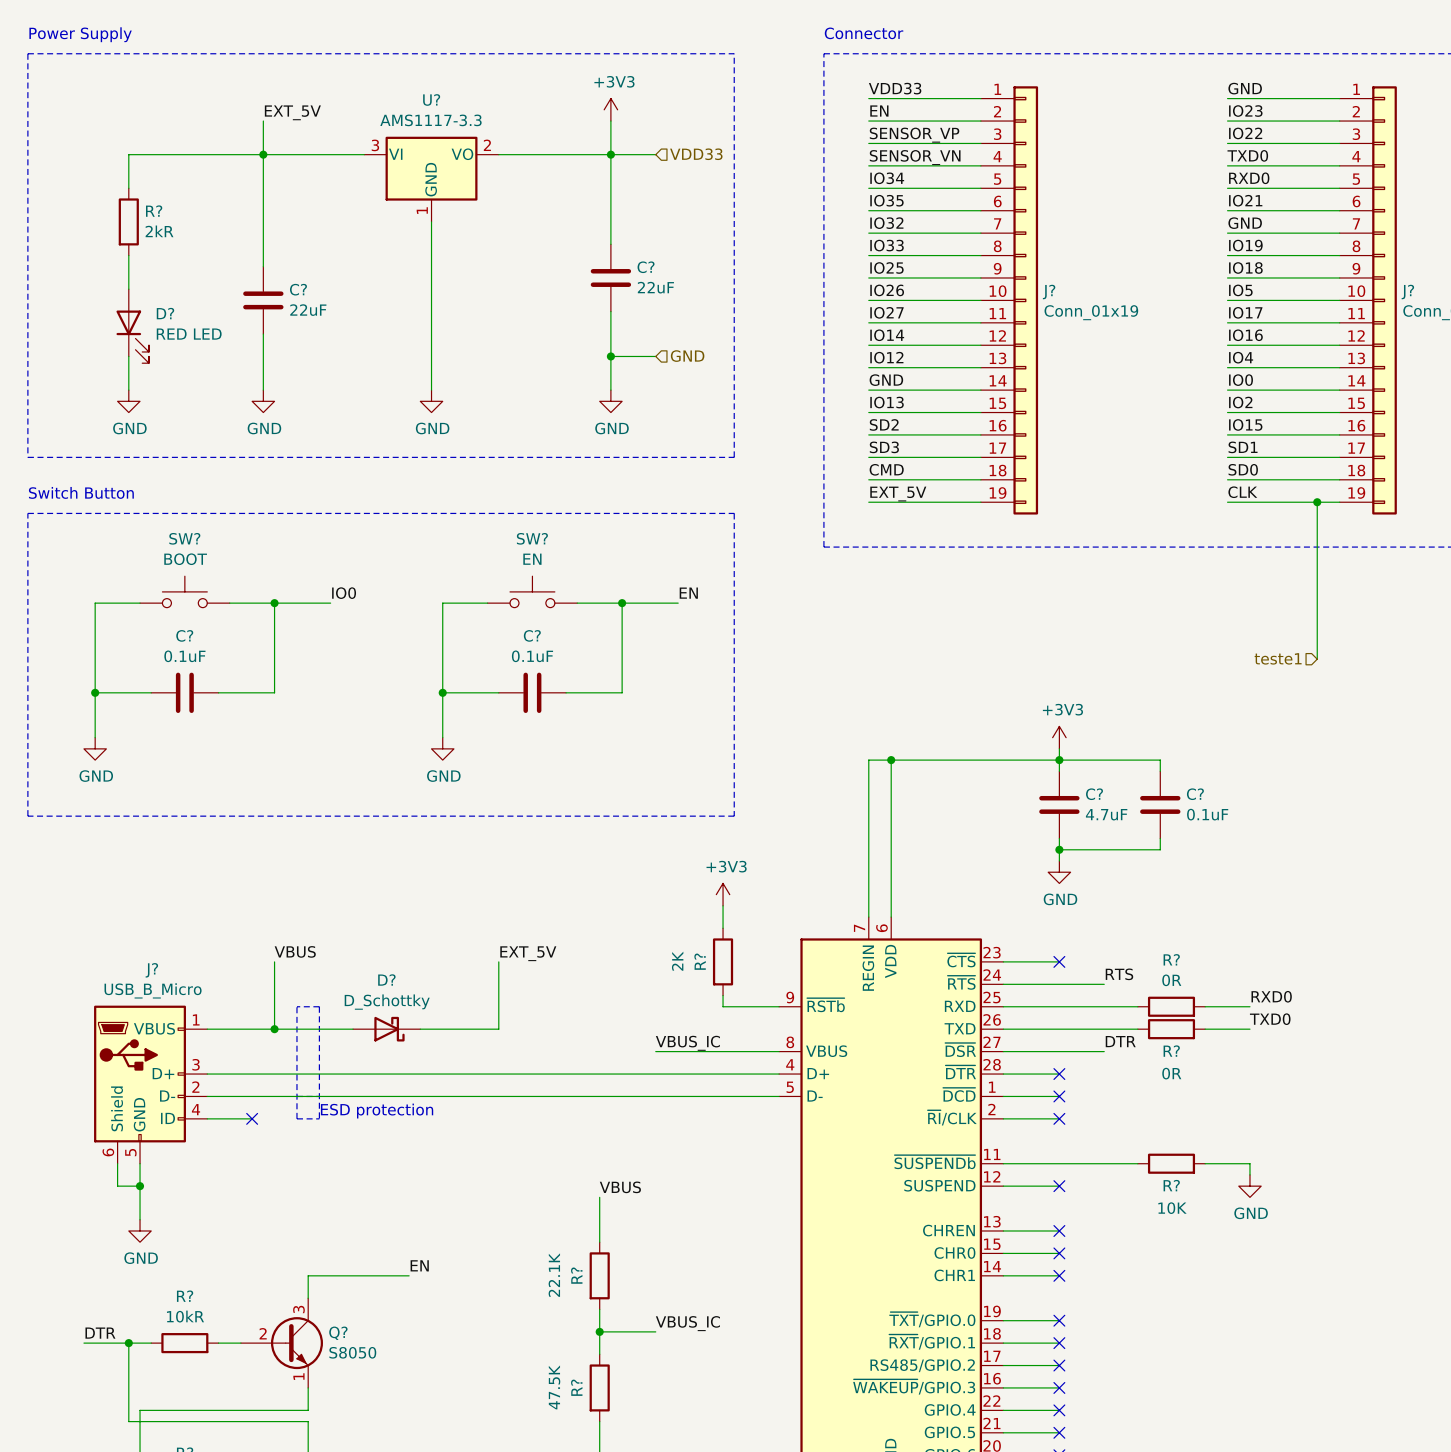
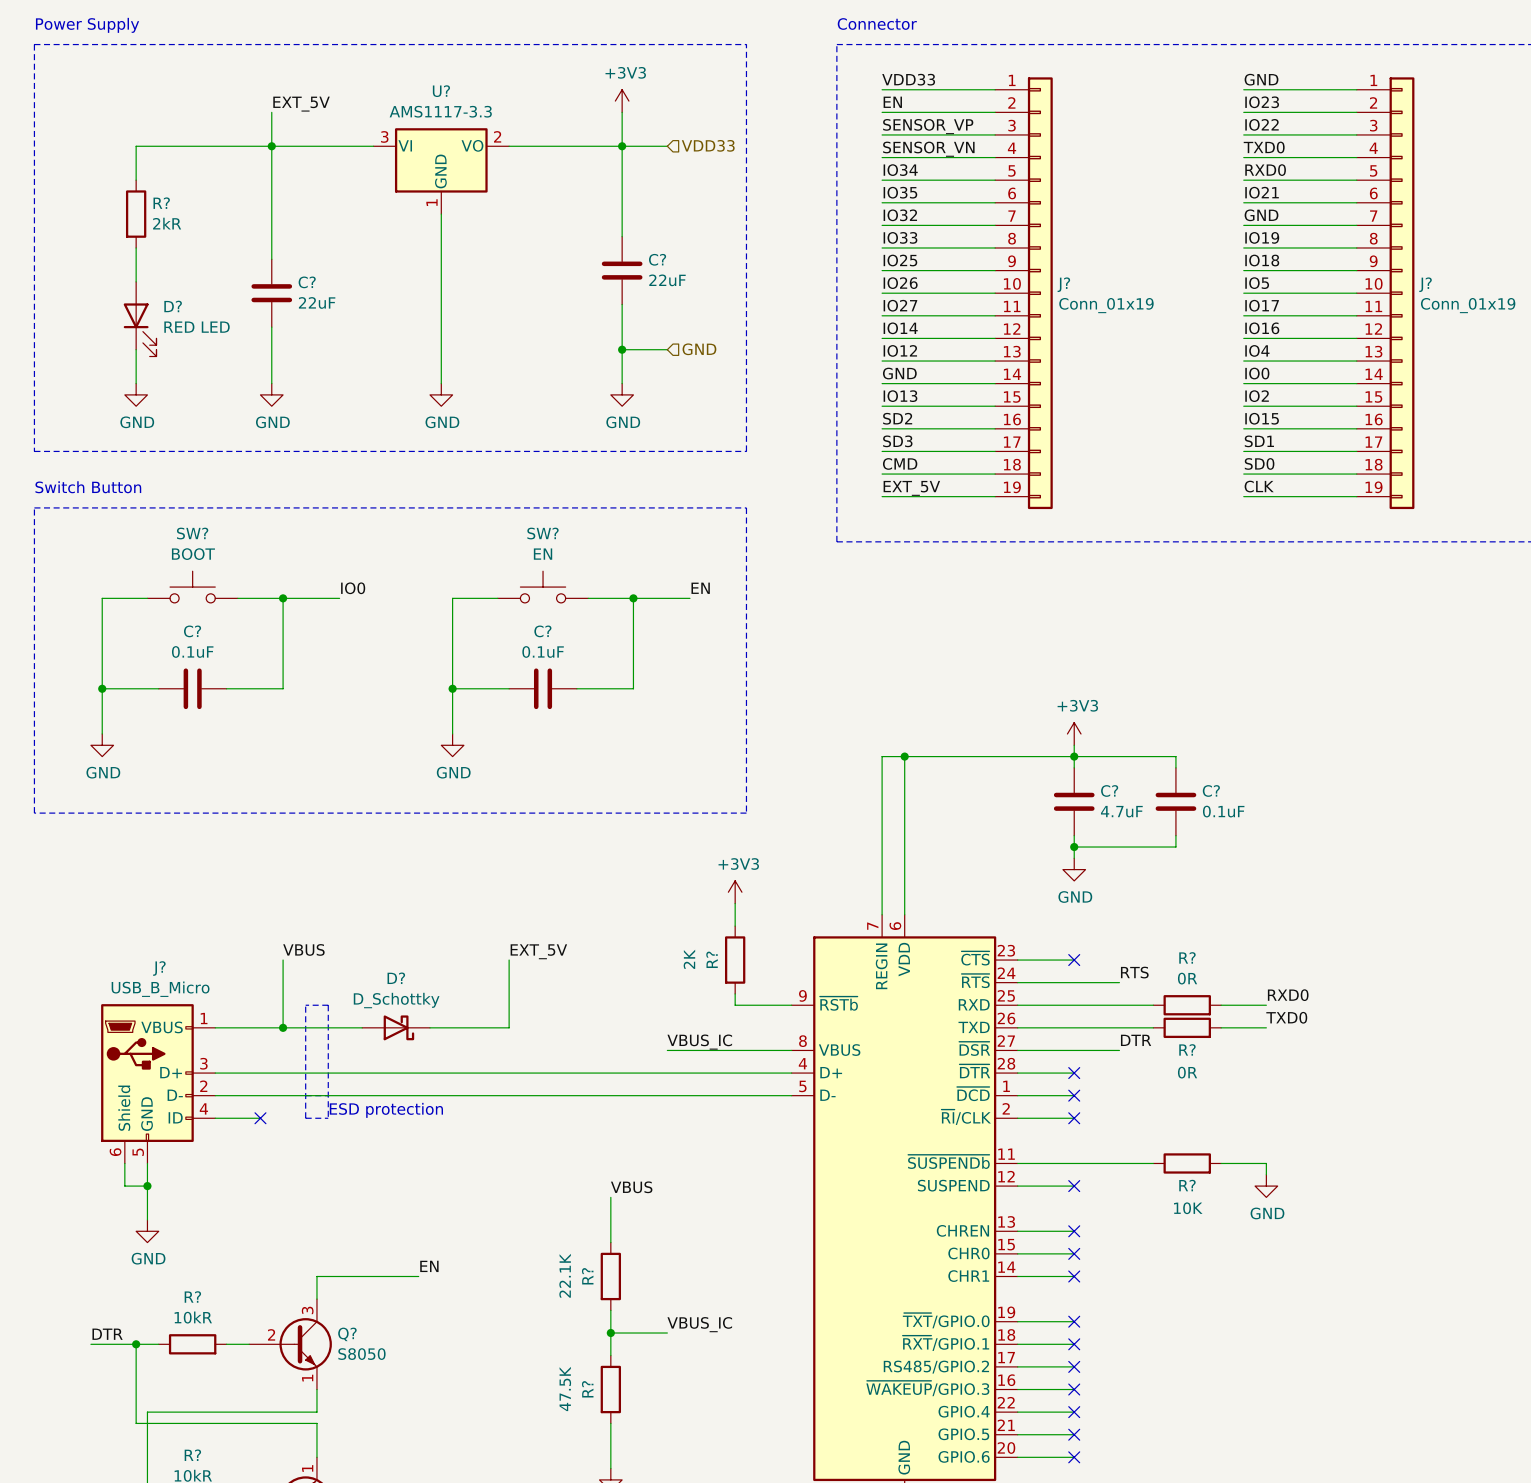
wire: (1317, 502) (1317, 659) -> none
junction: (1317, 502) -> none
hierarchical label: teste1 (1278, 658) -> none

